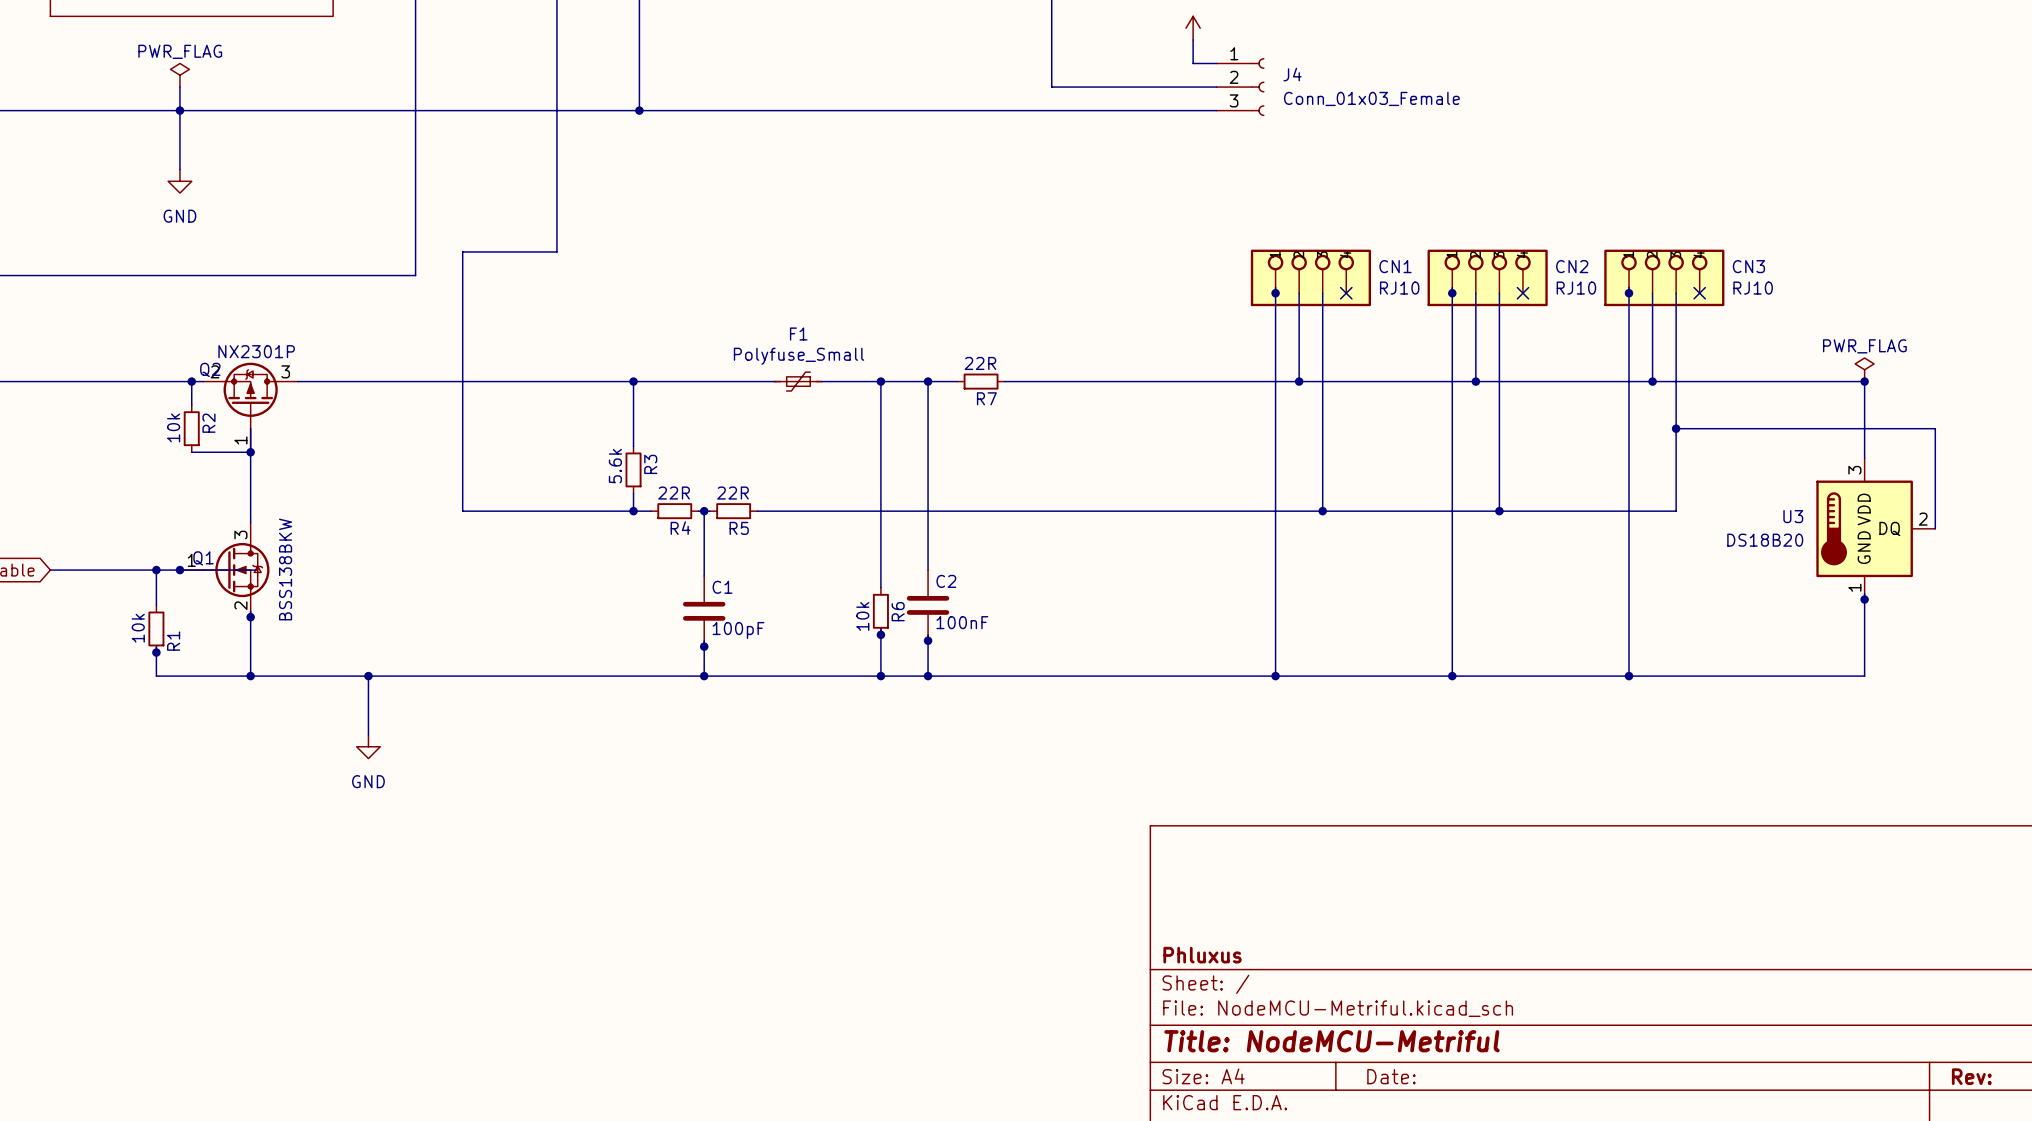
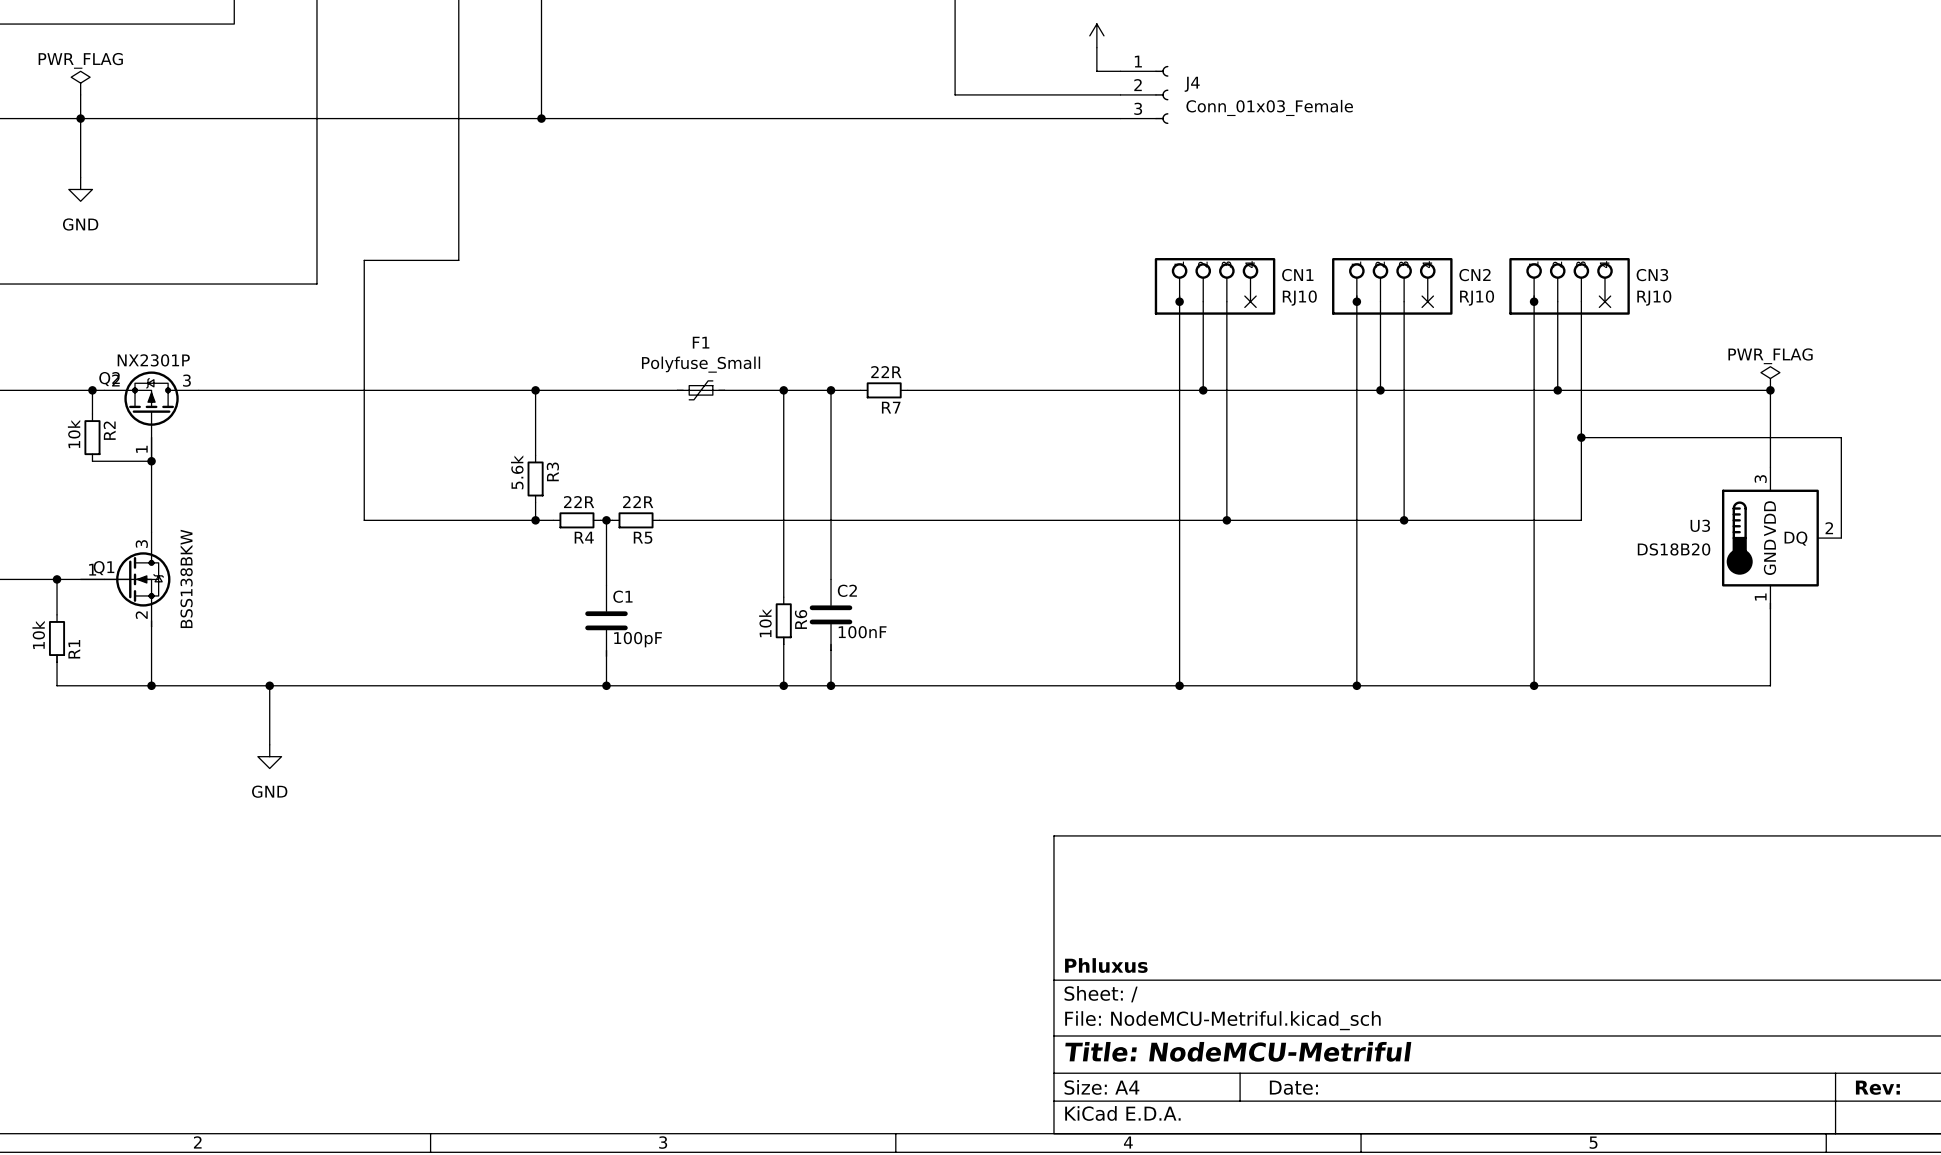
junction: (179, 570) -> none
junction: (1864, 599) -> none
junction: (250, 617) -> none
junction: (880, 634) -> none
junction: (928, 640) -> none
junction: (704, 646) -> none
junction: (156, 652) -> none

